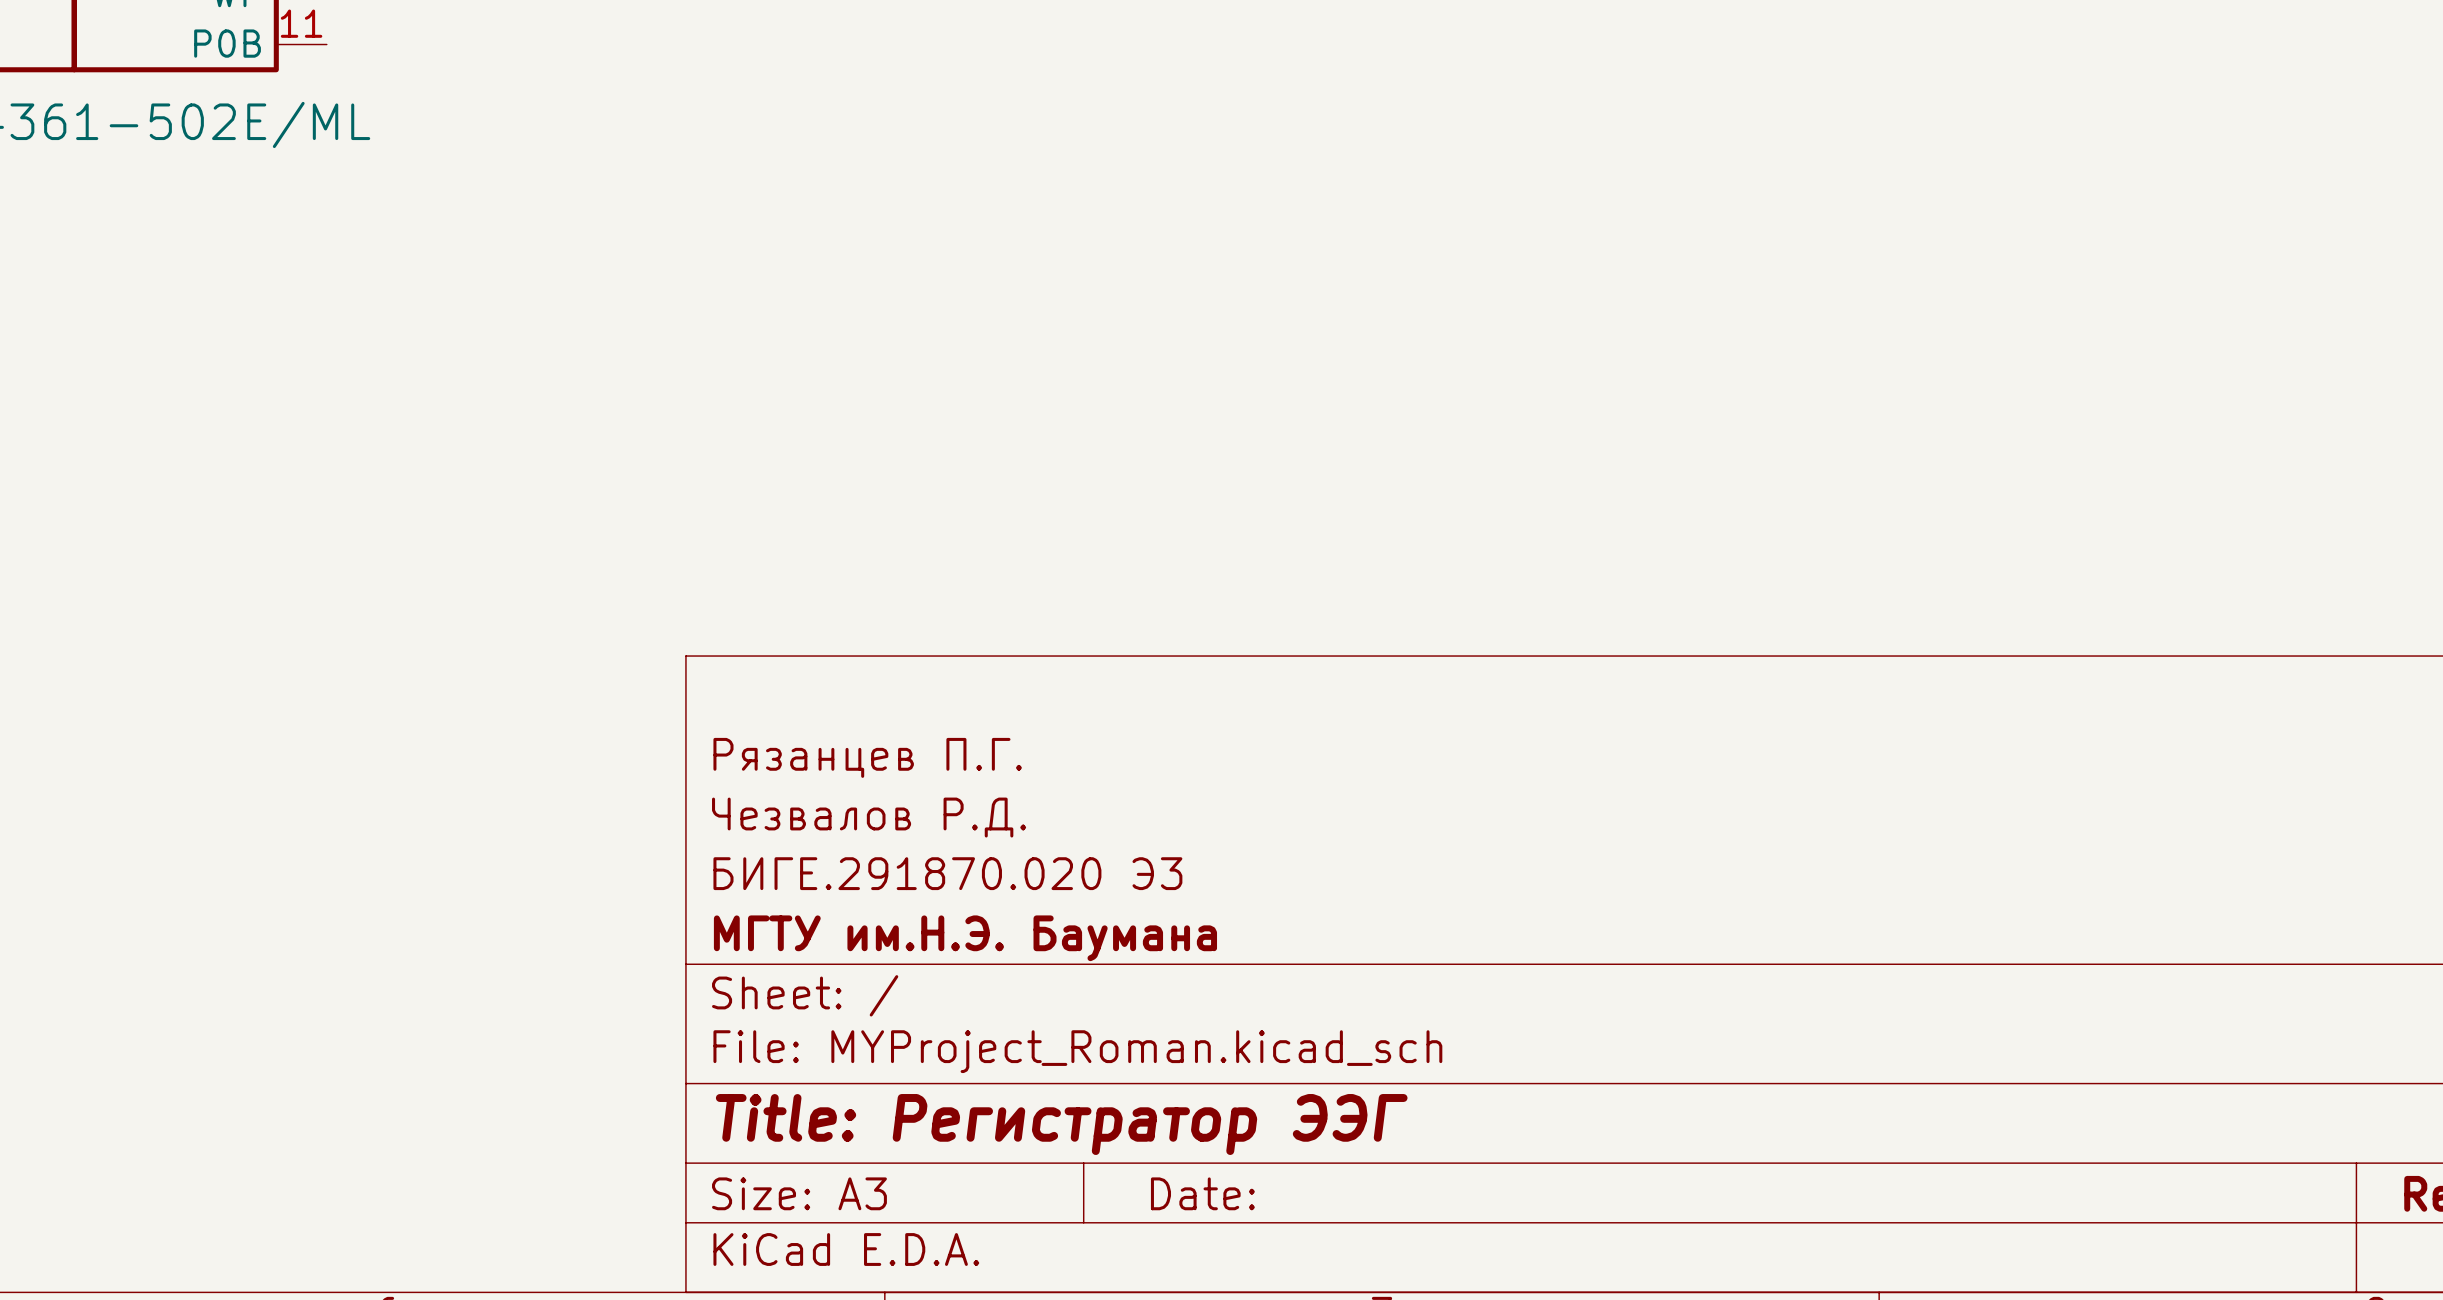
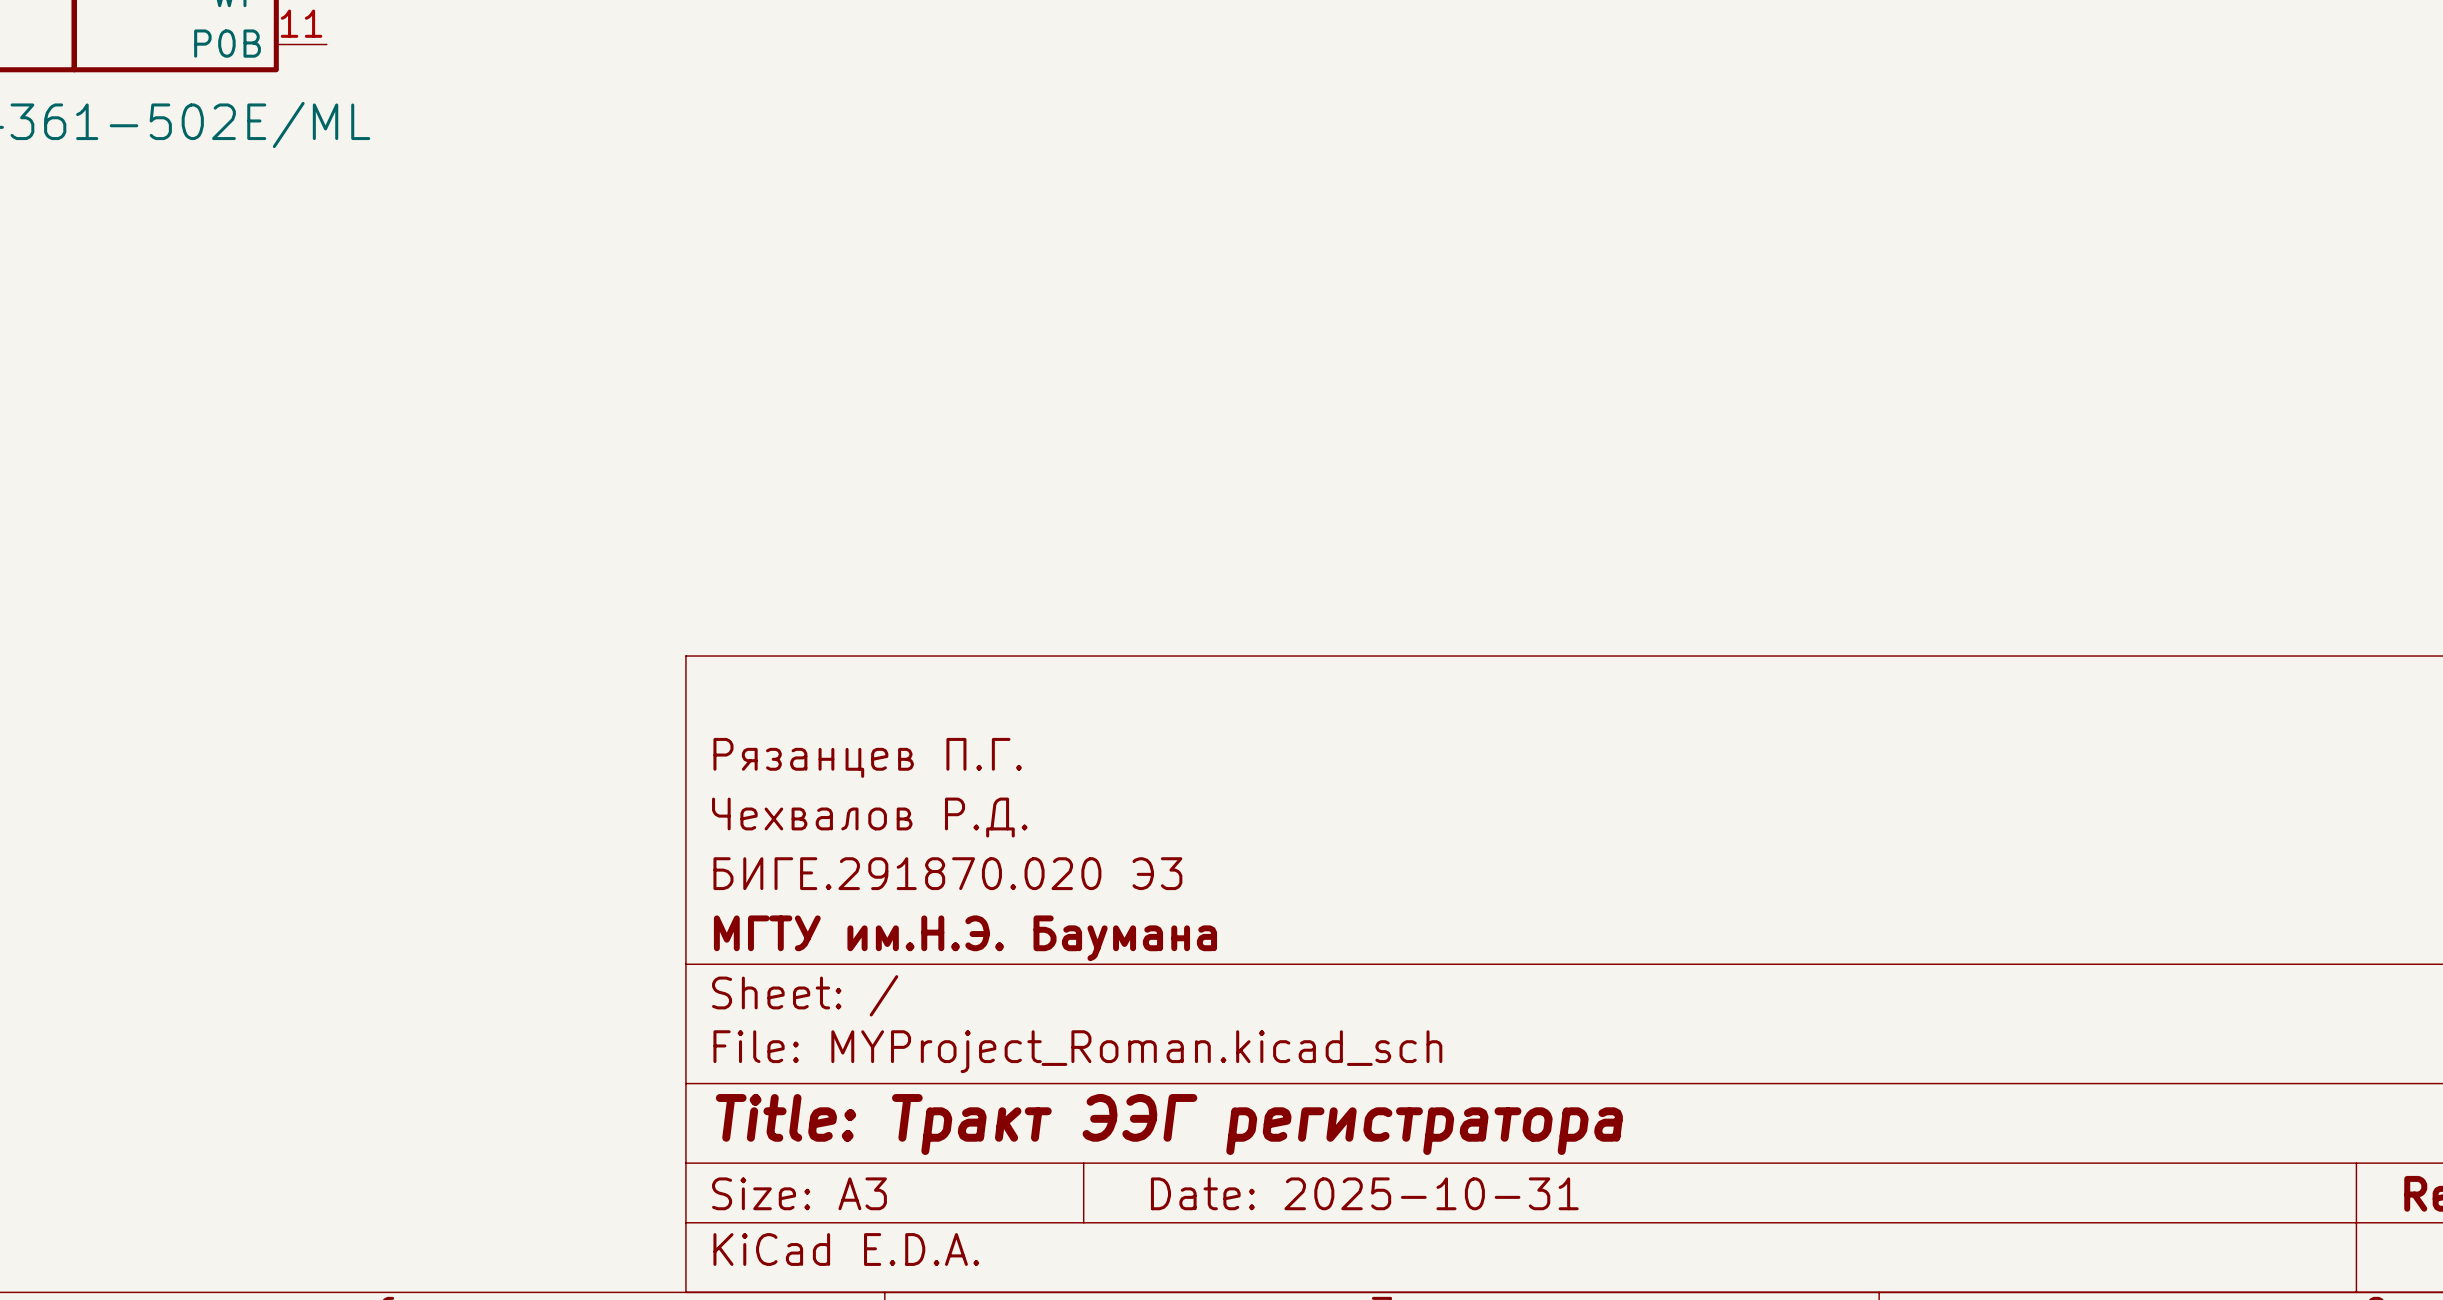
title block: Чезвалов Р.Д. (869, 817) -> Чехвалов Р.Д. (869, 817)
title block: Title: Регистратор ЭЭГ (1061, 1124) -> Title: Тракт ЭЭГ регистратора (1169, 1124)
title block: Date: (1202, 1193) -> Date: 2025-10-31 (1364, 1193)

